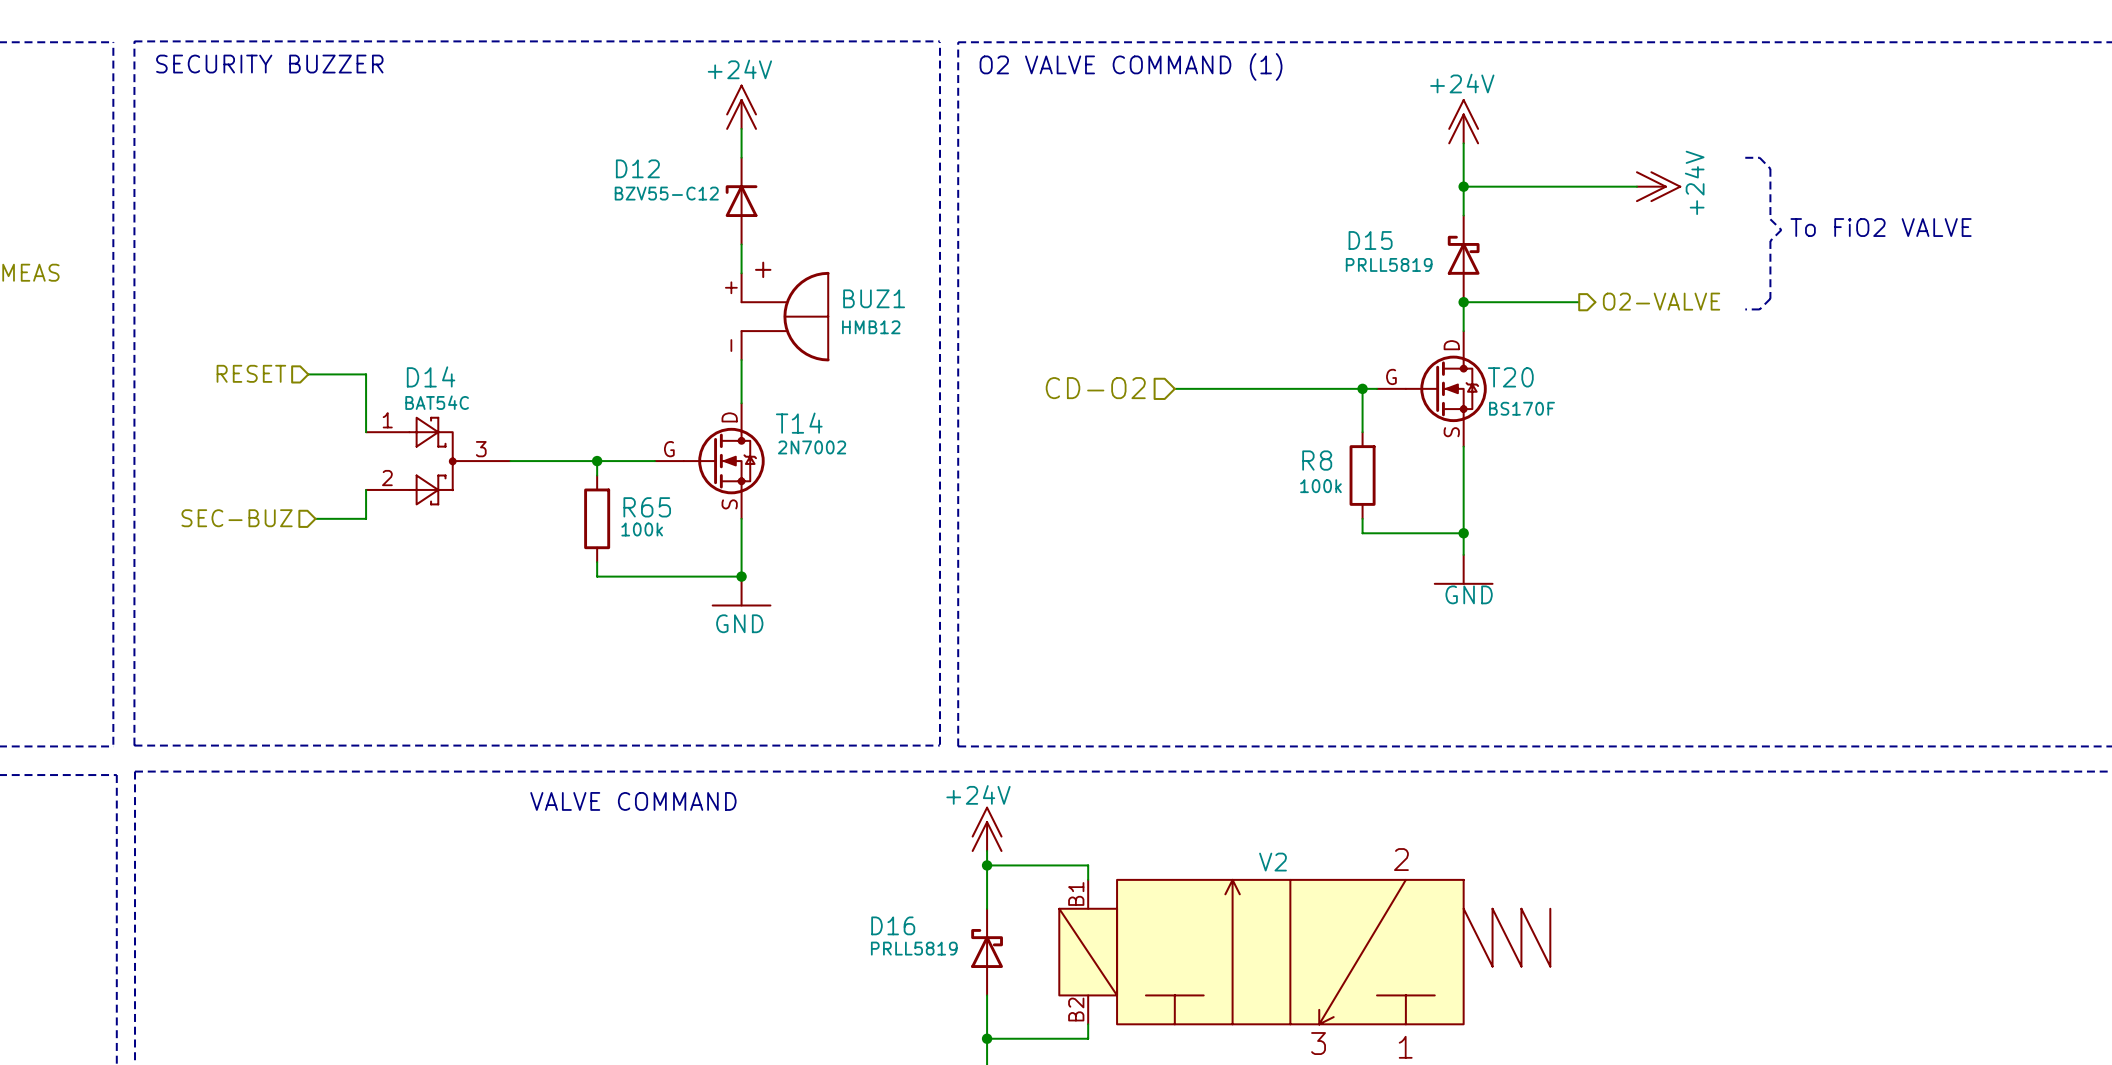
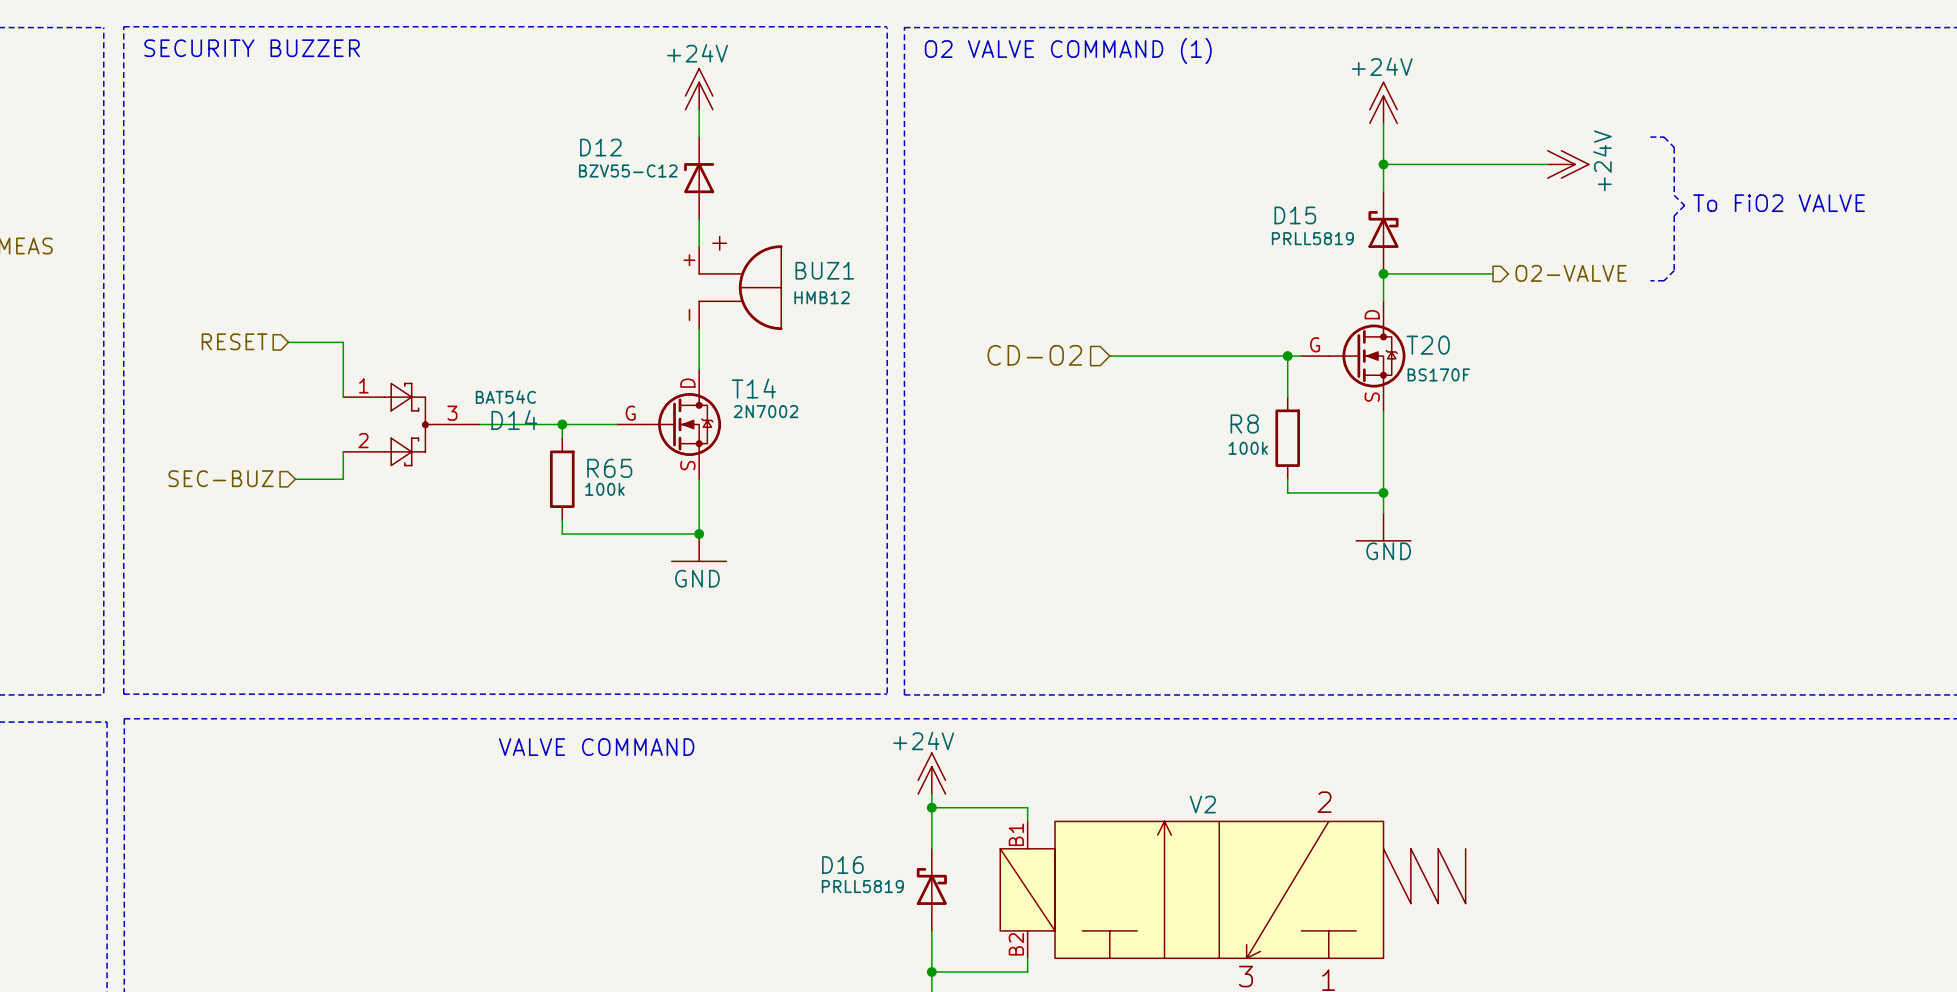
D14 name position: D14 (431, 376) -> D14 (514, 420)
D14 value position: BAT54C (437, 402) -> BAT54C (505, 397)

